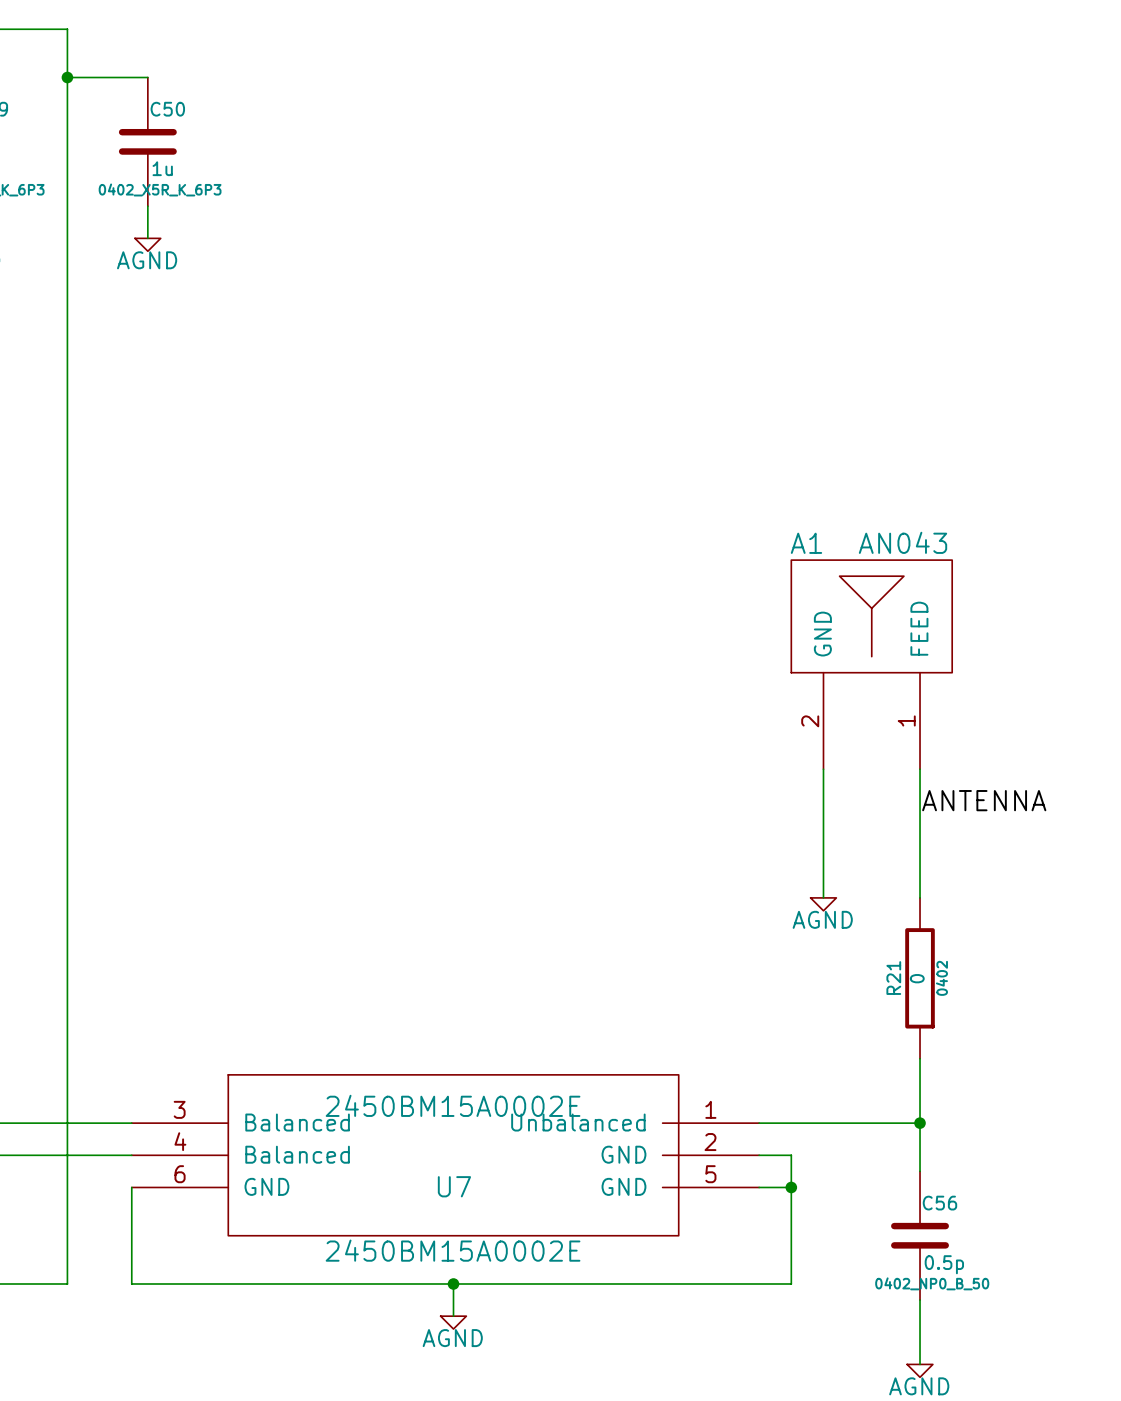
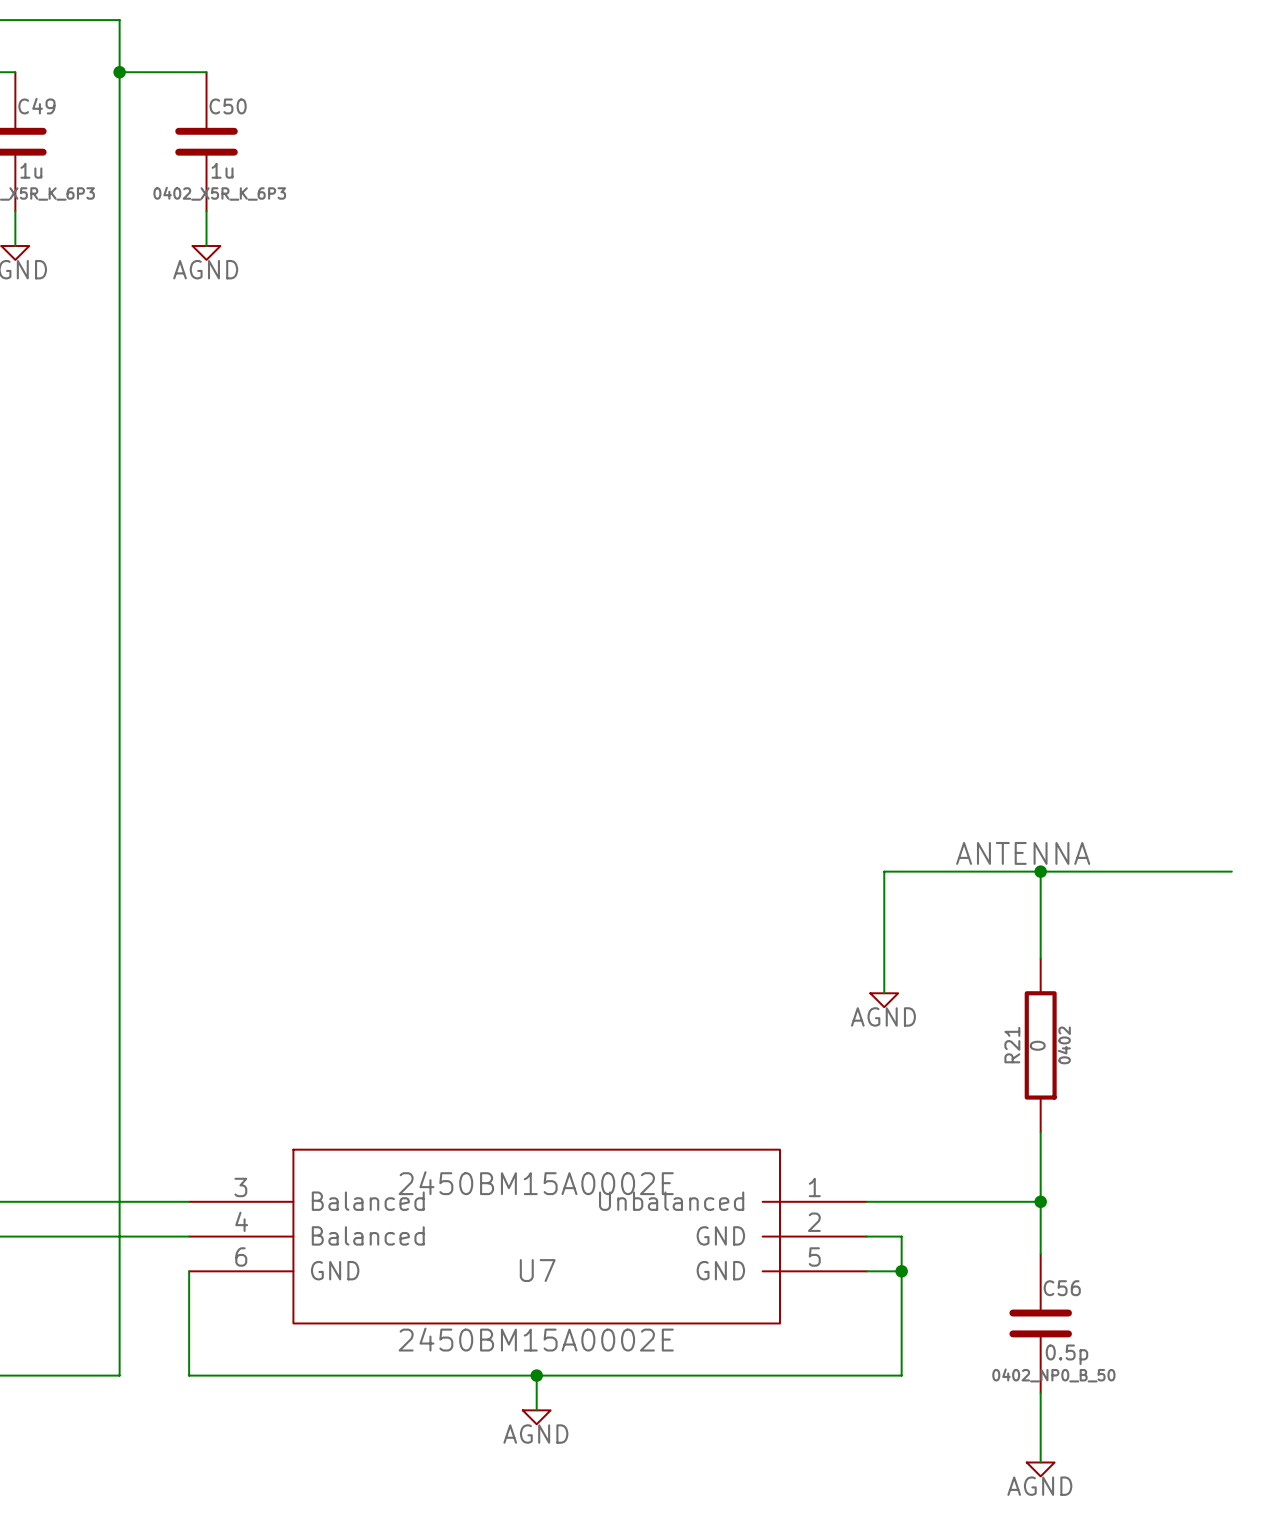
A1: AN043 (871, 664) -> none
wire: (823, 769) (823, 897) -> none
wire: (920, 769) (920, 817) -> none
label position: ANTENNA (984, 800) -> ANTENNA (1023, 853)
junction: none -> (1040, 871)
wire: none -> (1231, 871) (884, 871) (884, 993)
power symbol position: AGND (823, 904) -> AGND (884, 1000)

